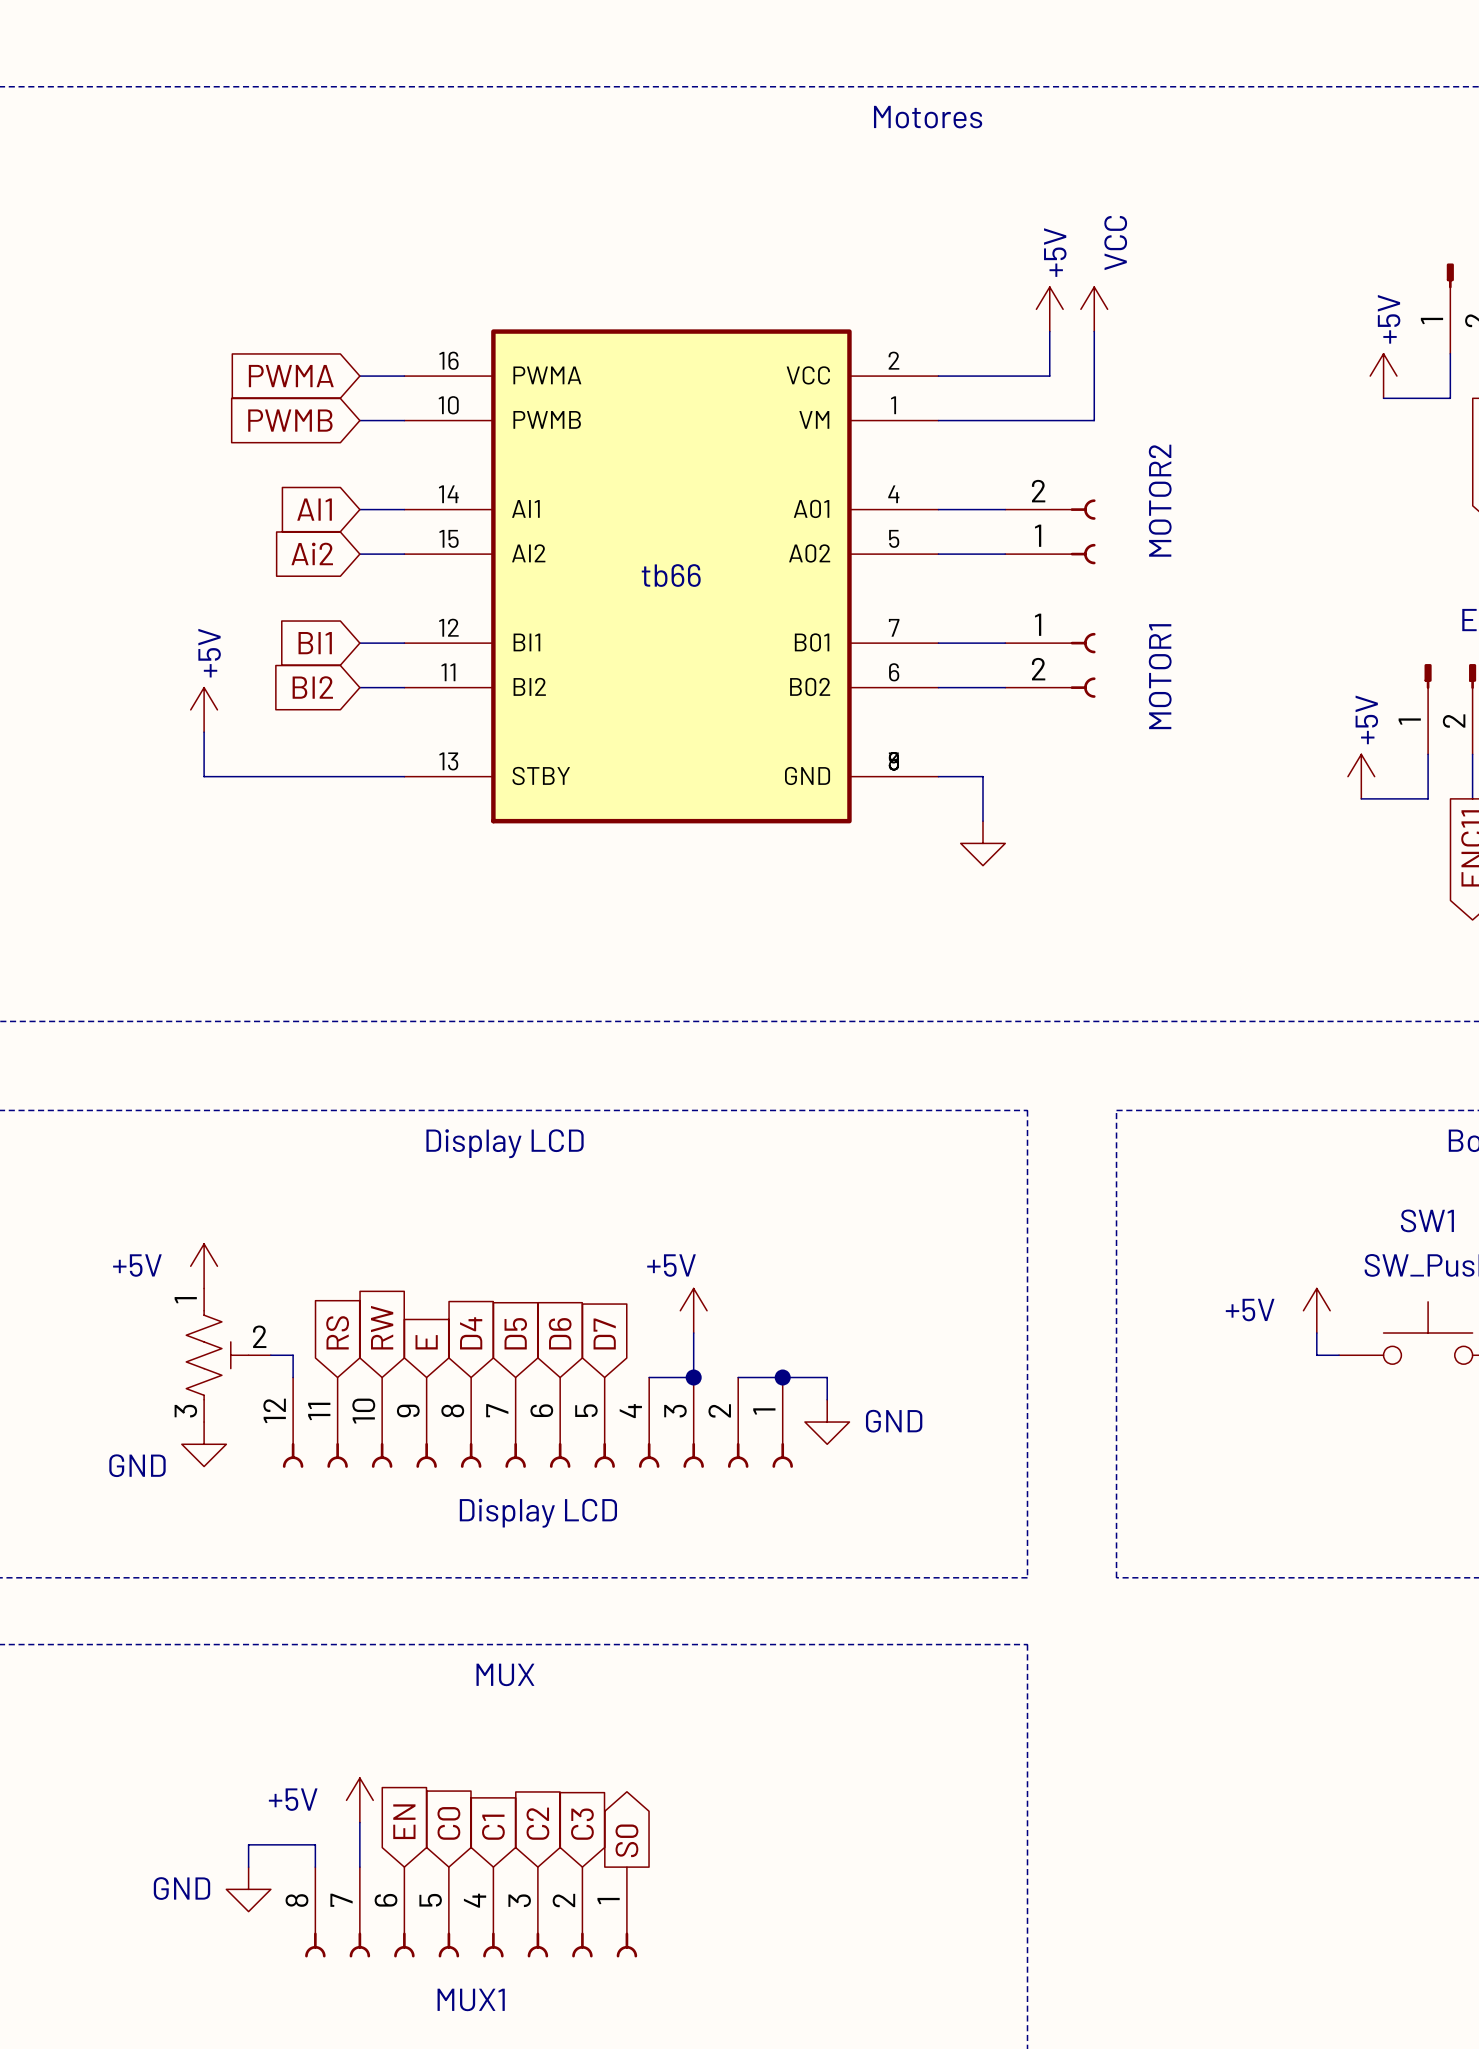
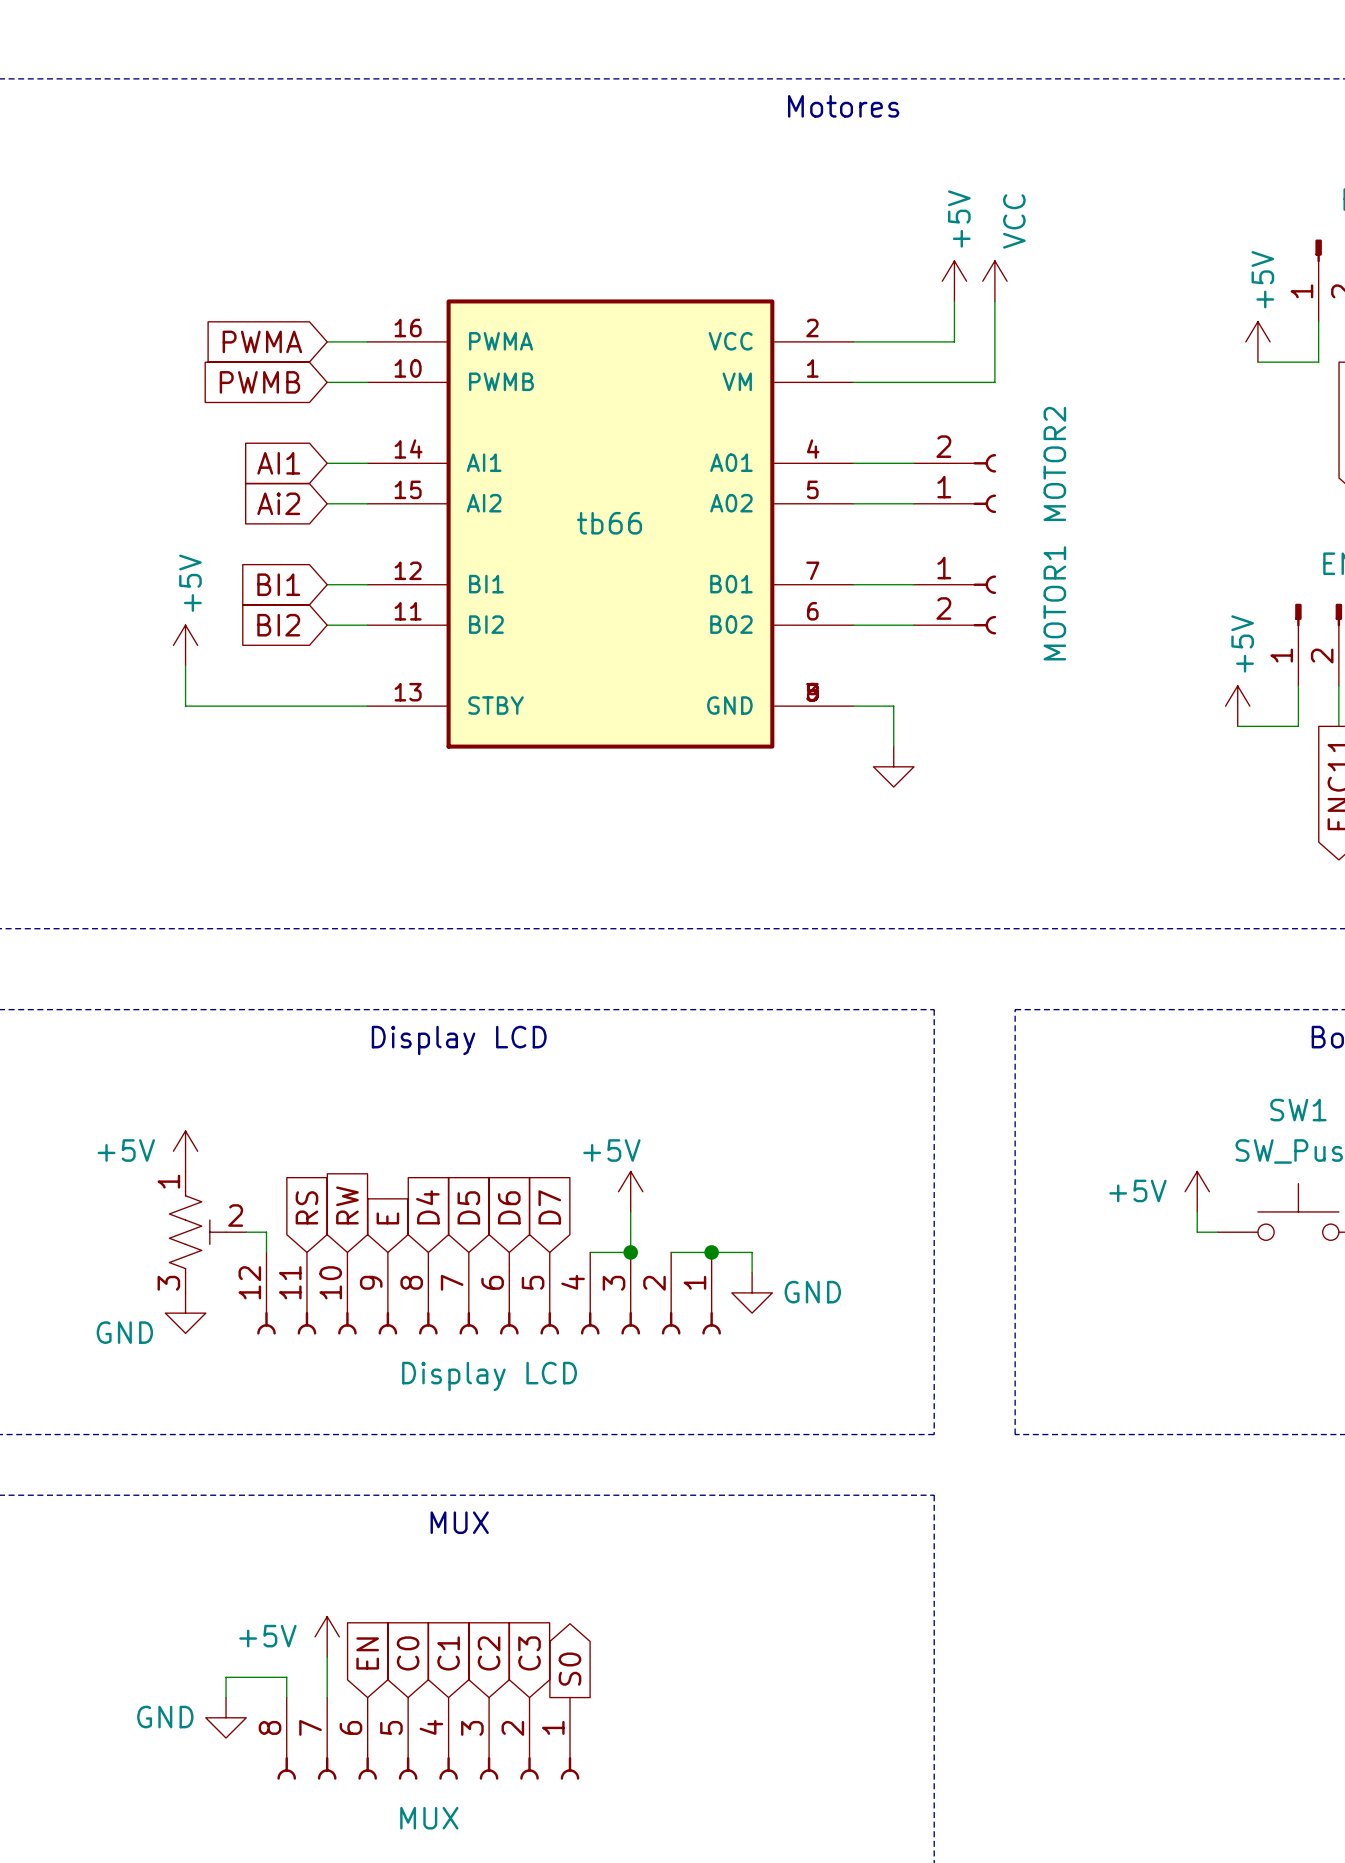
MUX1 name: MUX1 (471, 1999) -> MUX (429, 1818)

